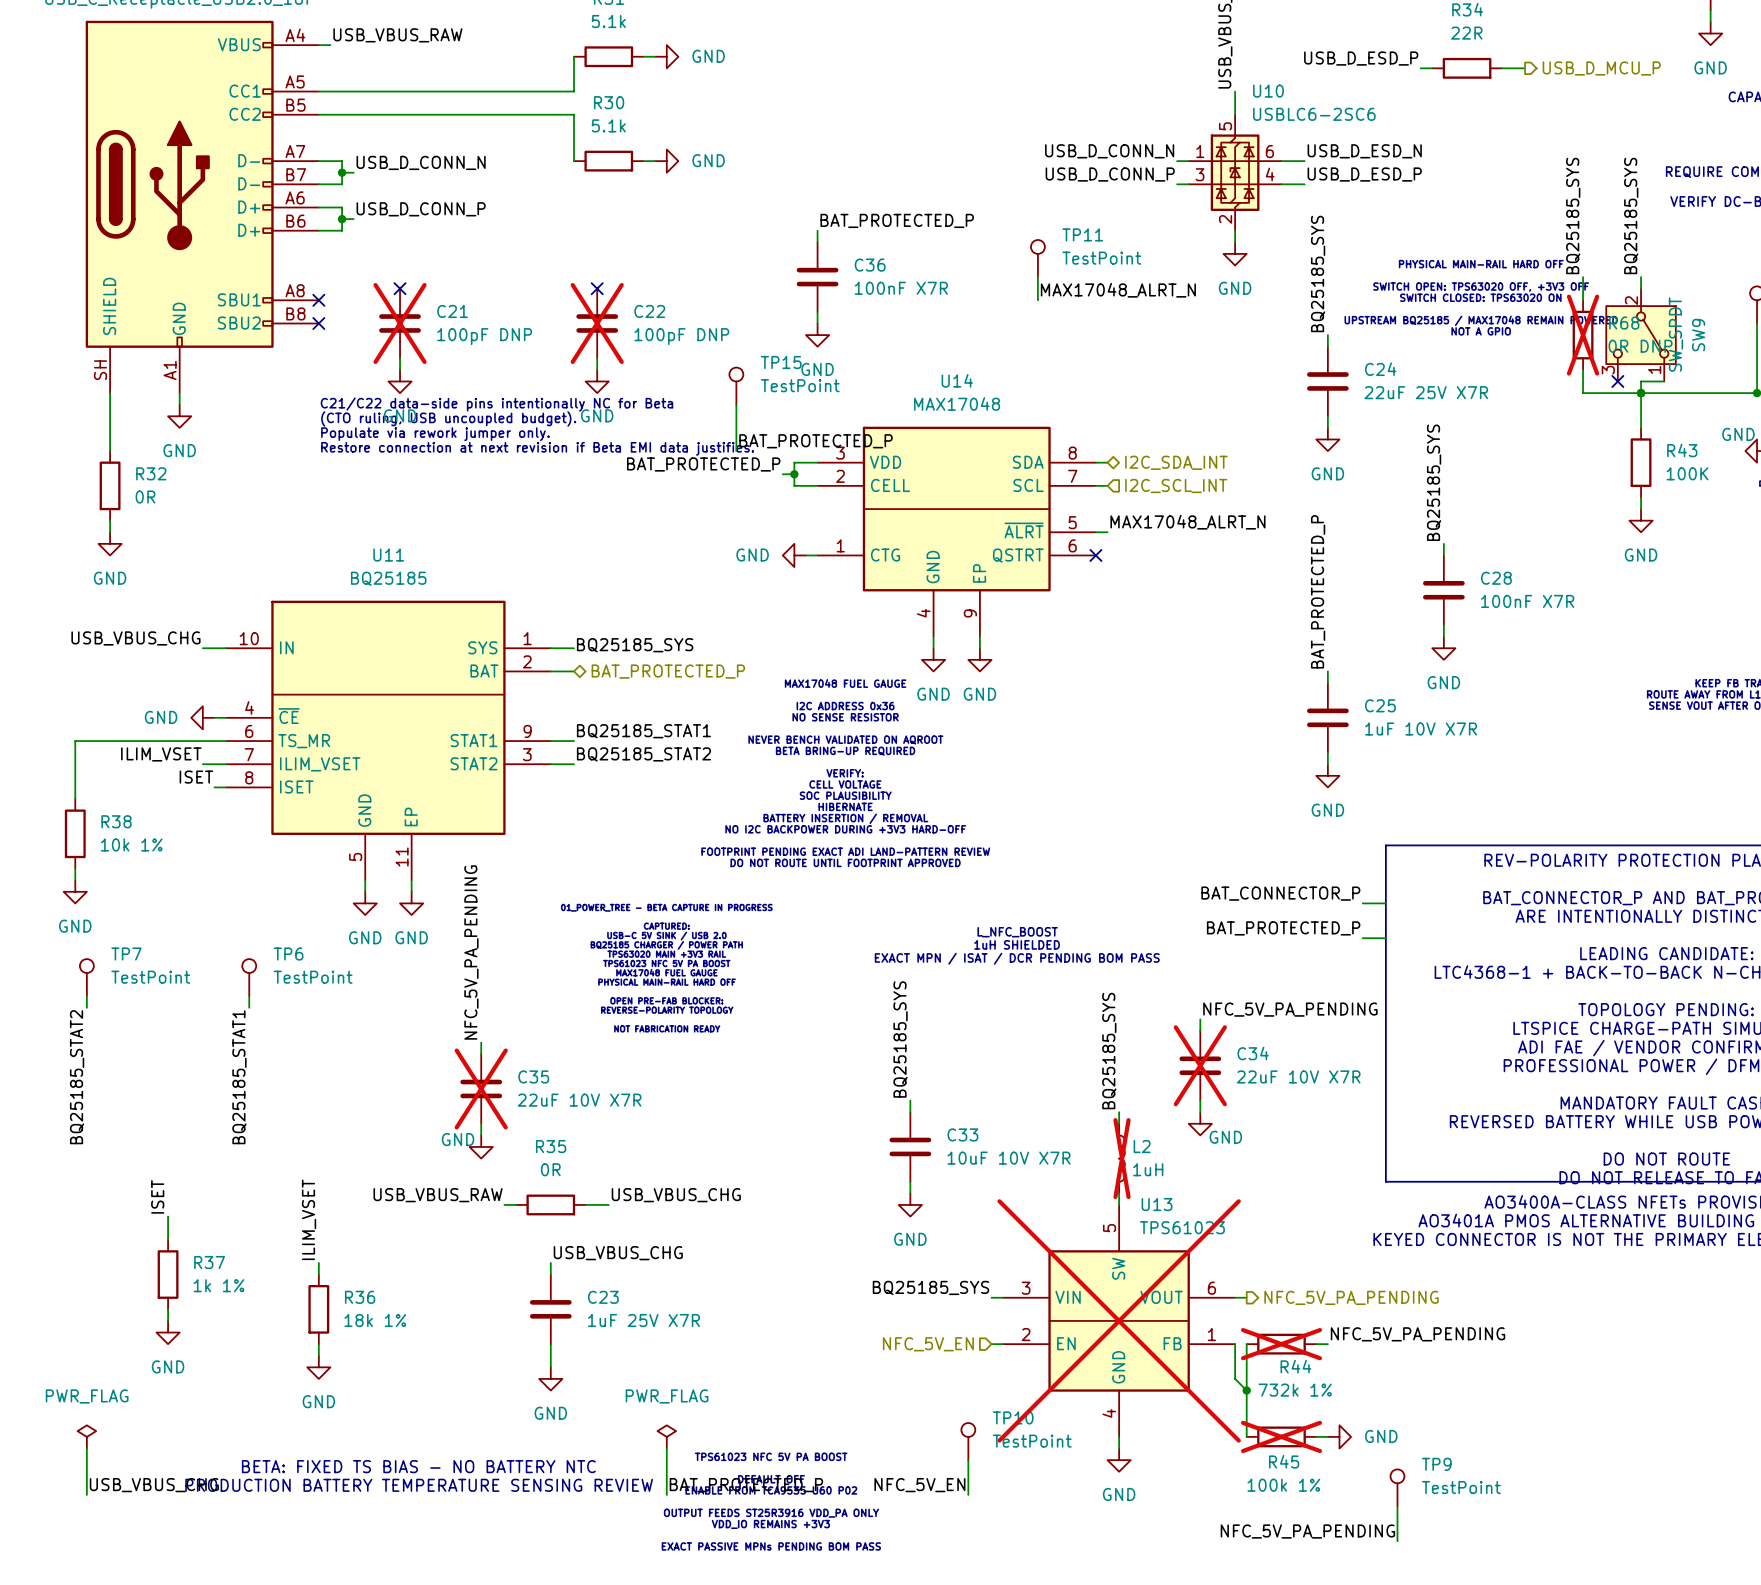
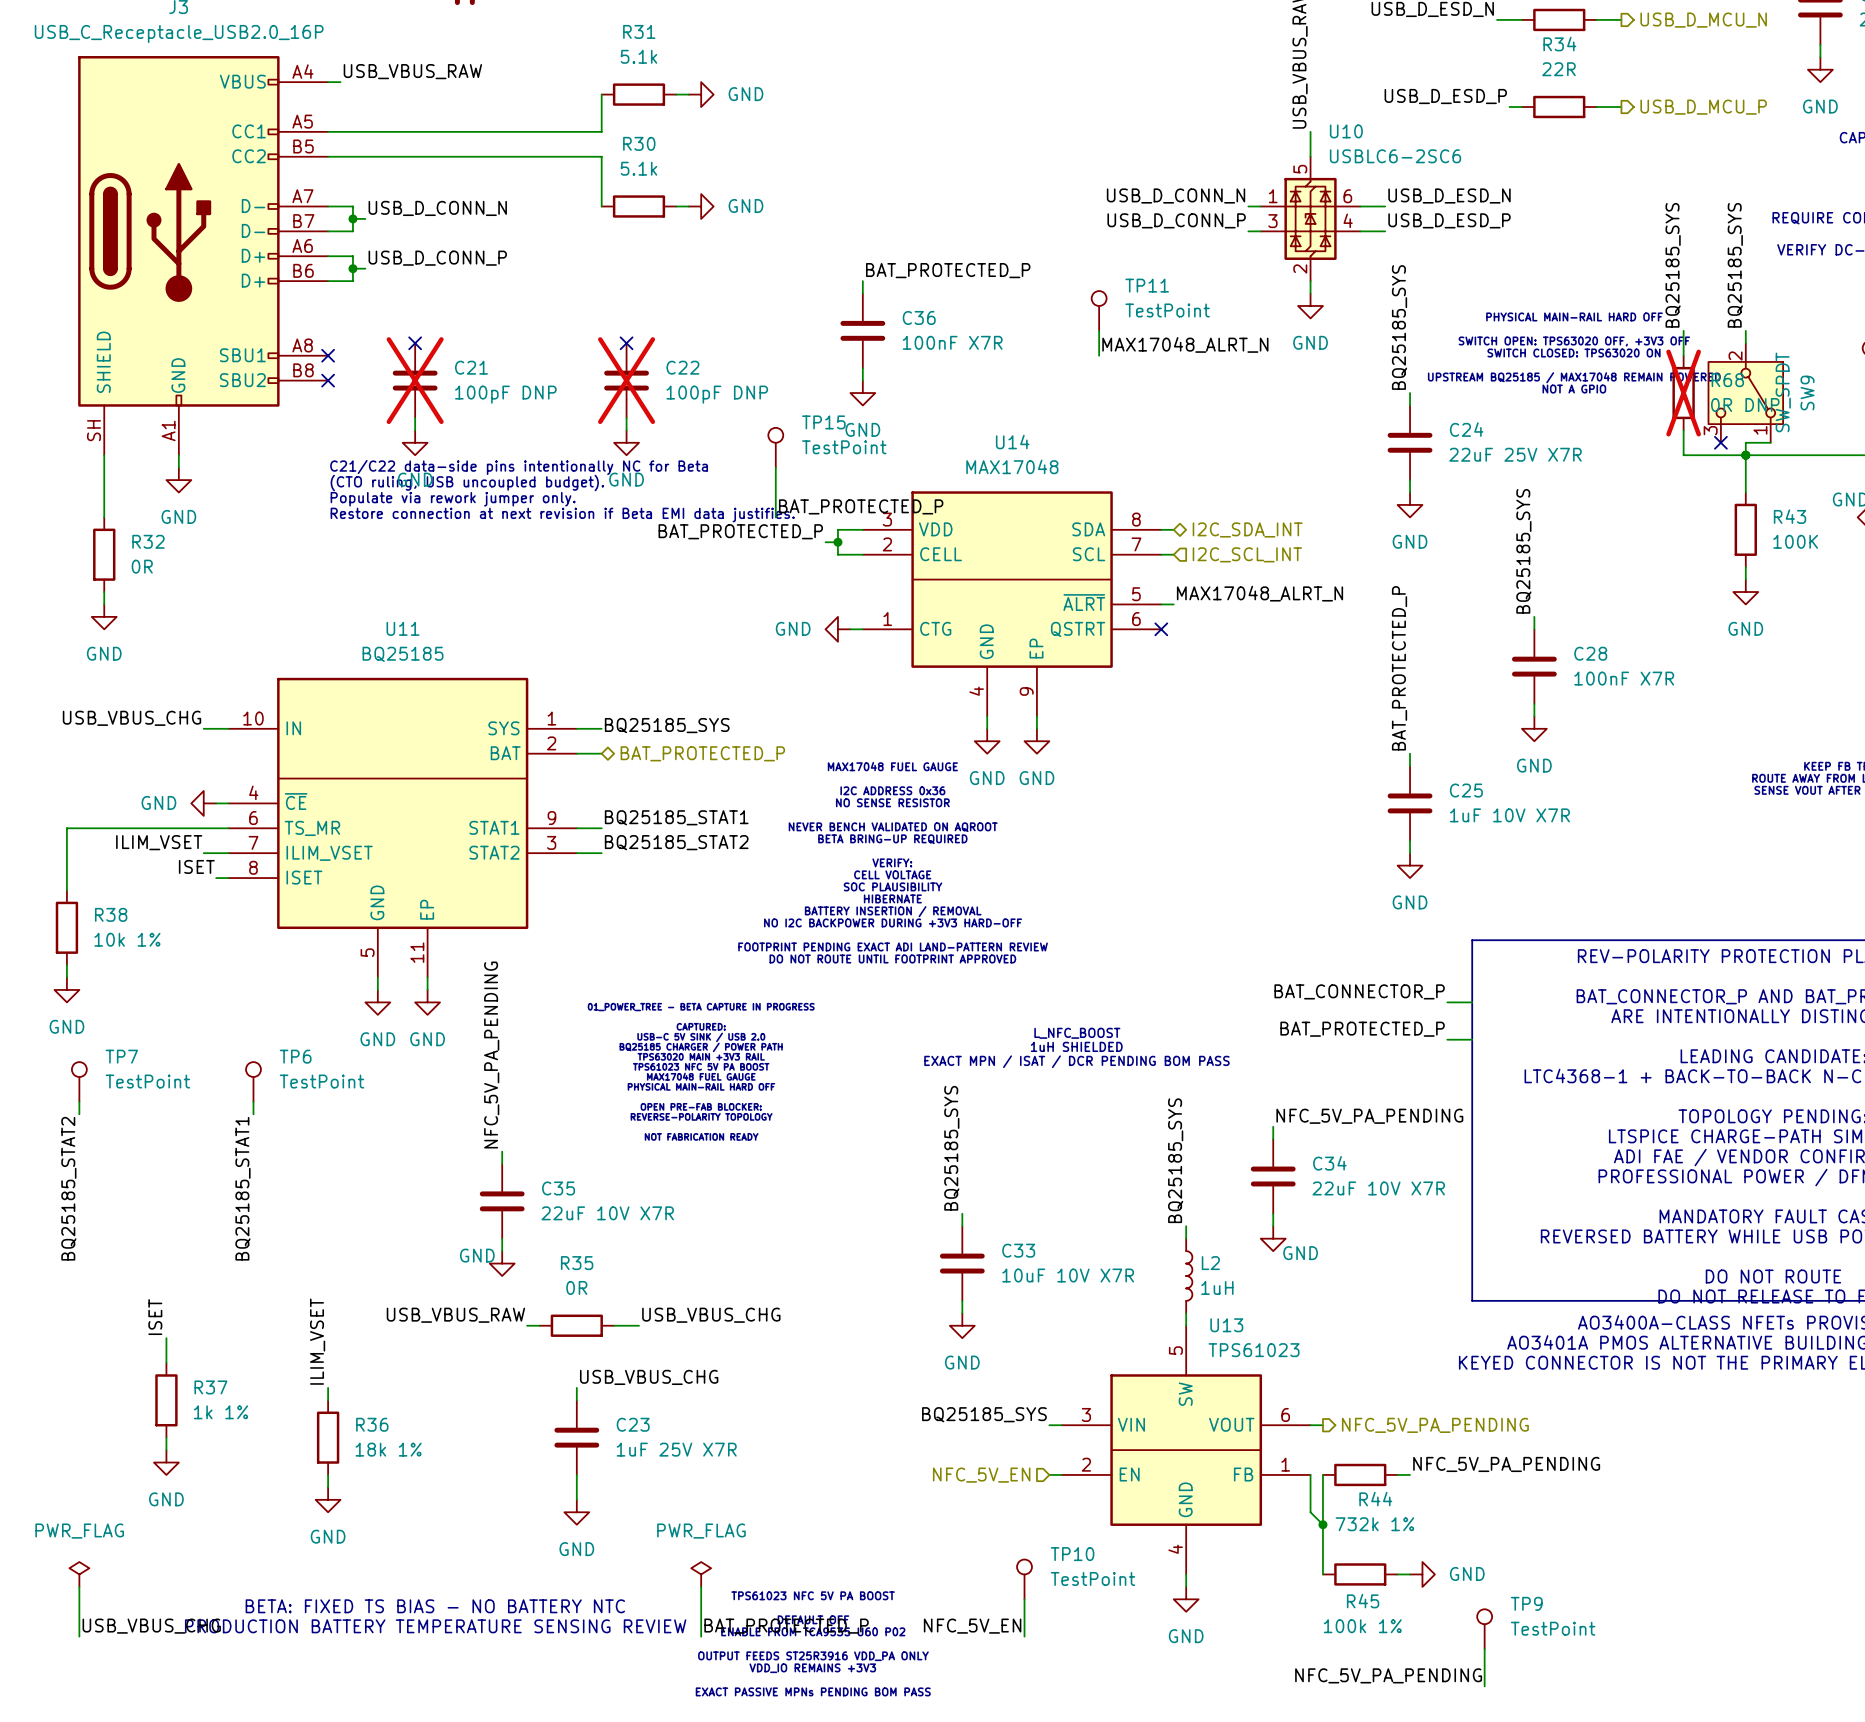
C34 do-not-place cross: (1200, 1065) -> none
C35 do-not-place cross: (481, 1088) -> none
L2 do-not-place cross: (1122, 1158) -> none
U13 do-not-place cross: (1119, 1320) -> none
R44 do-not-place cross: (1281, 1344) -> none
R45 do-not-place cross: (1281, 1436) -> none

